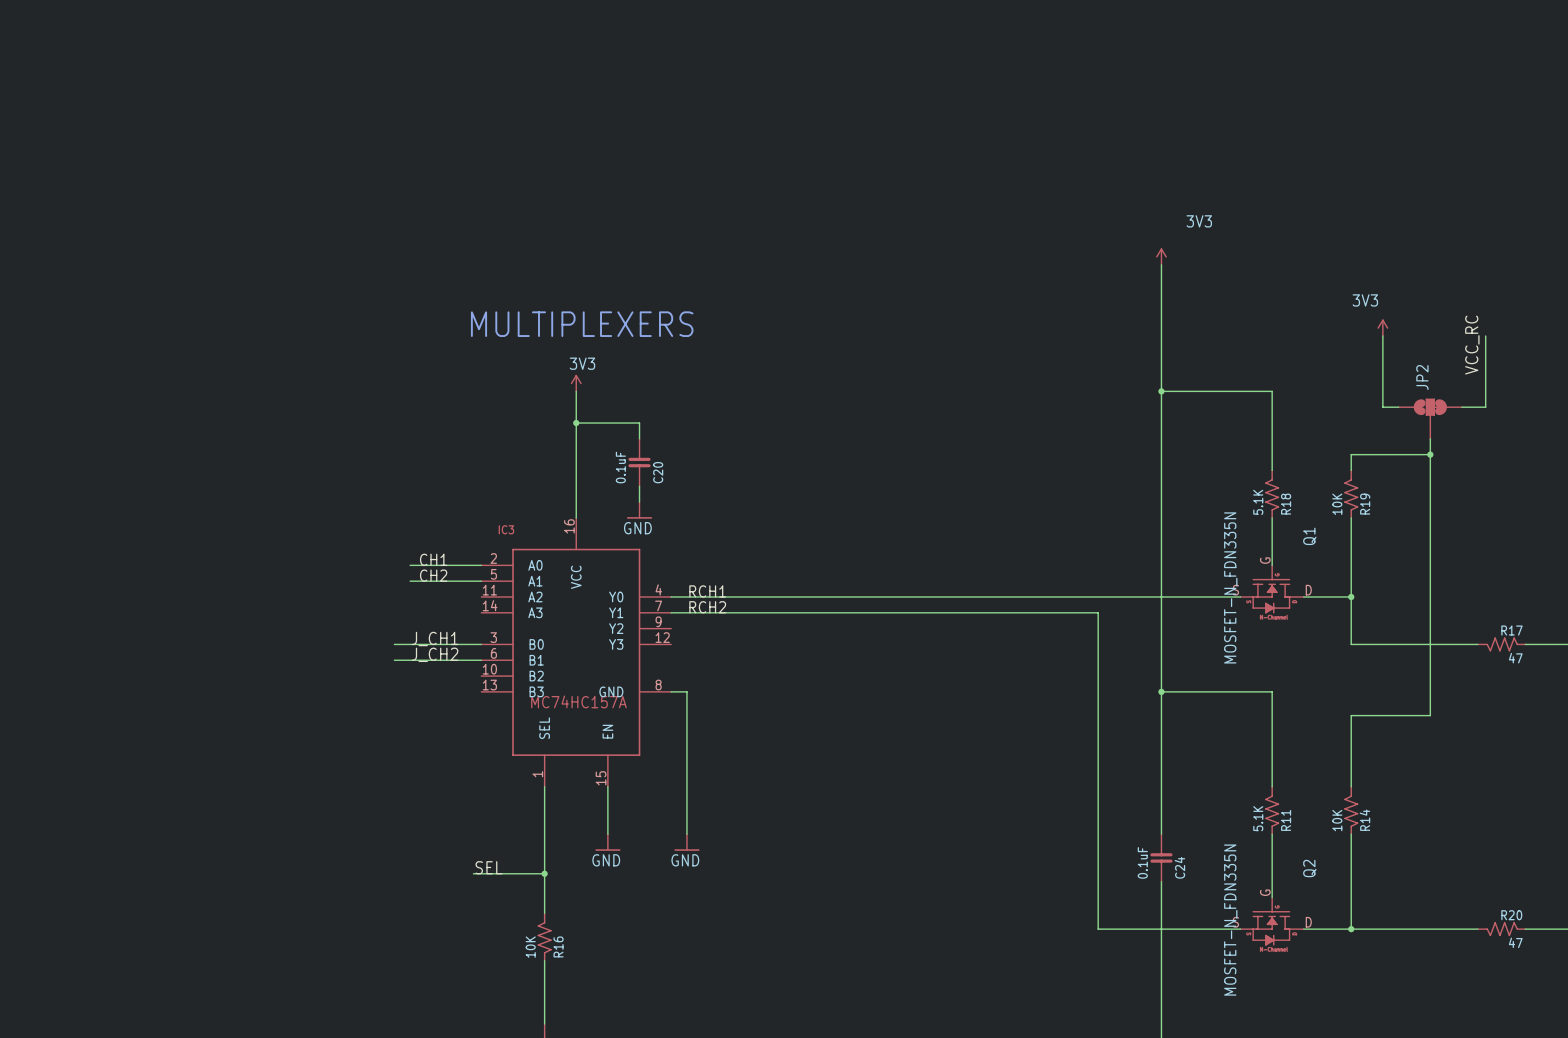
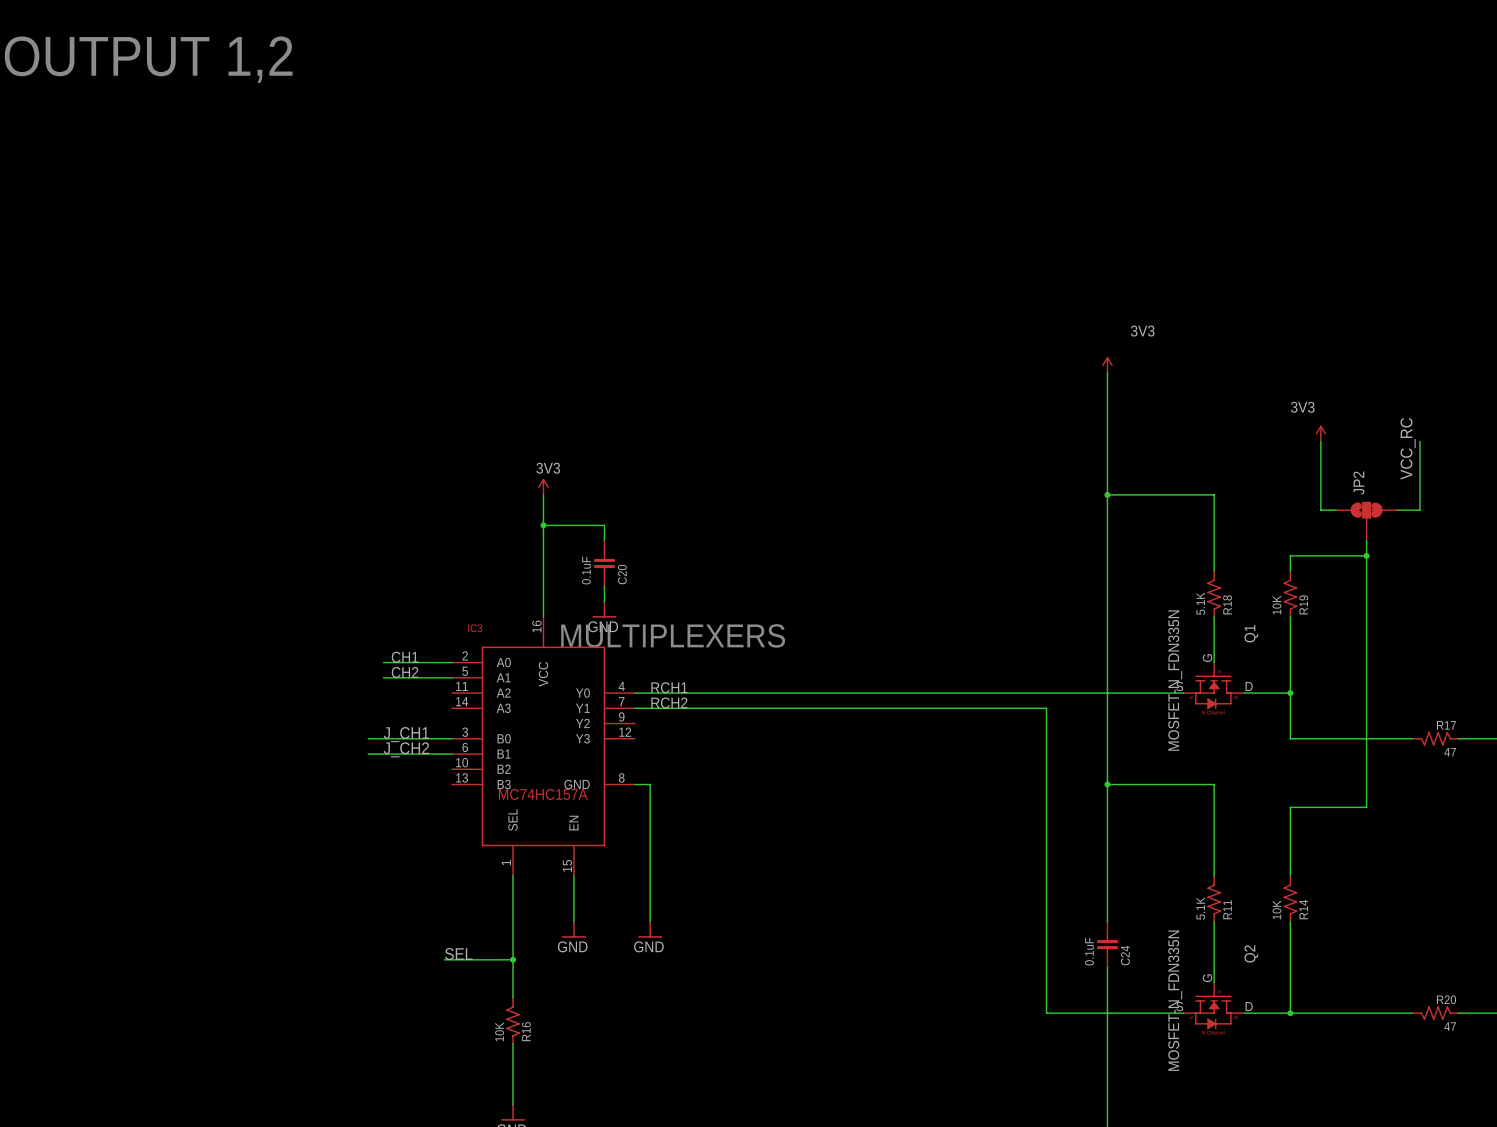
text: MULTIPLEXERS (582, 324) -> none
text: none -> MULTIPLEXERS (673, 635)

